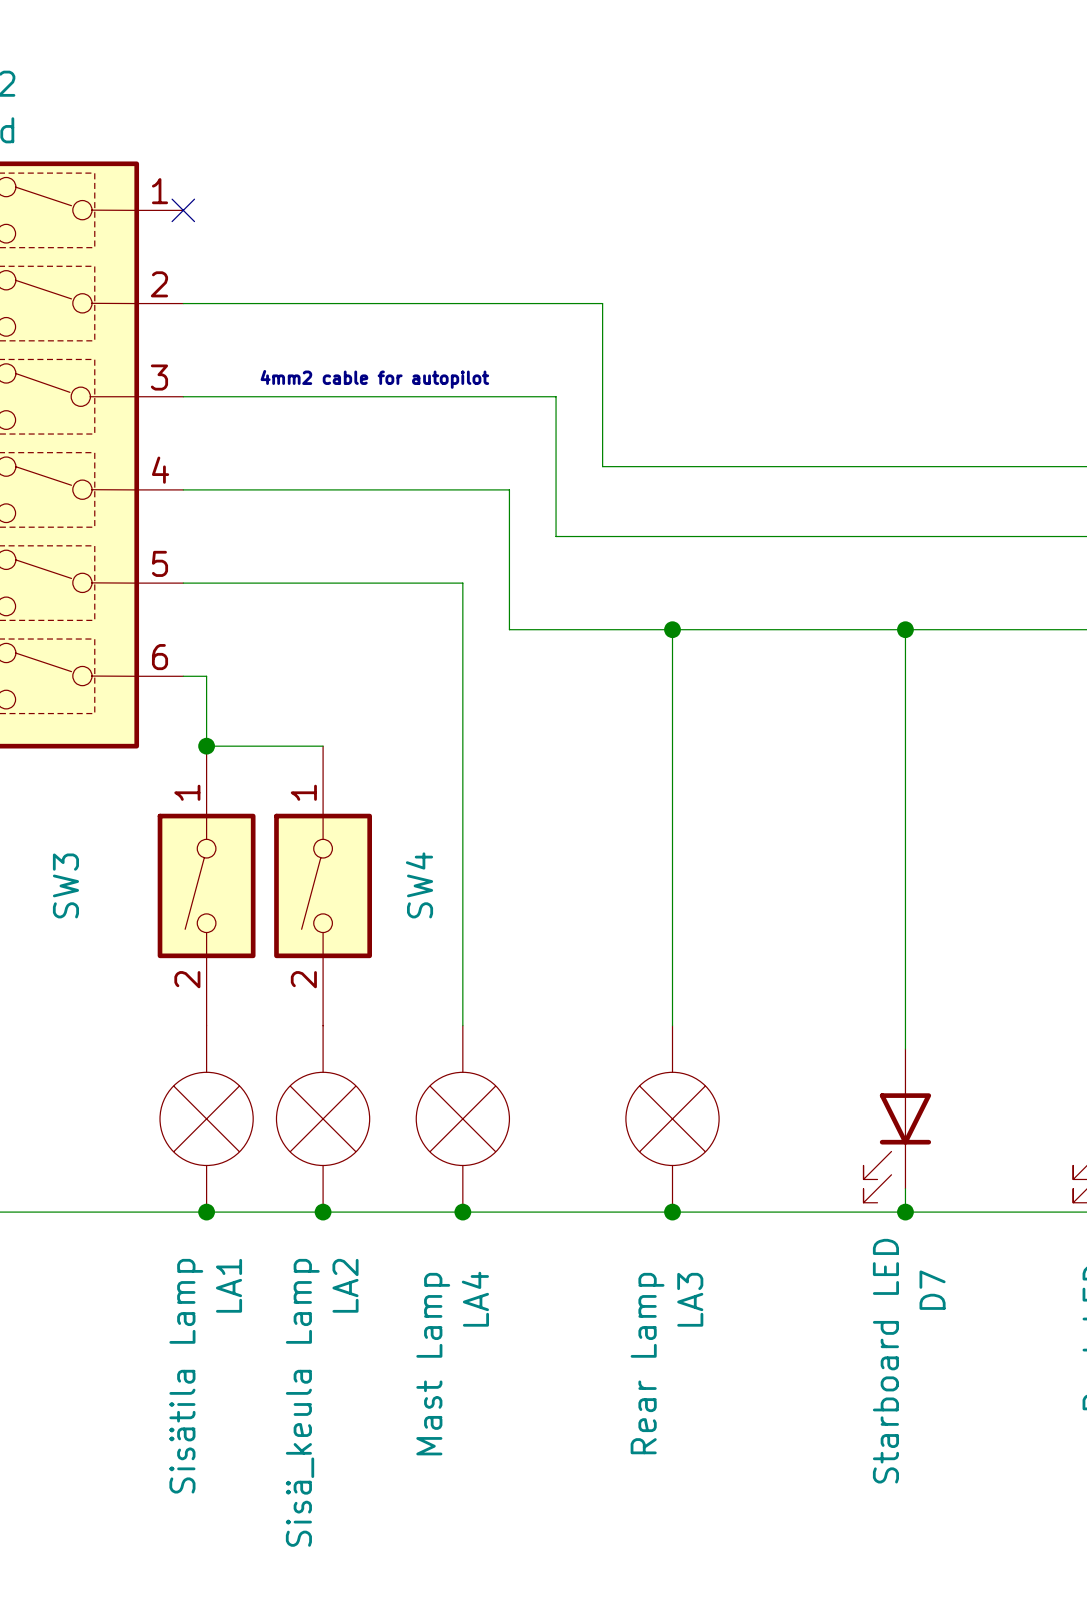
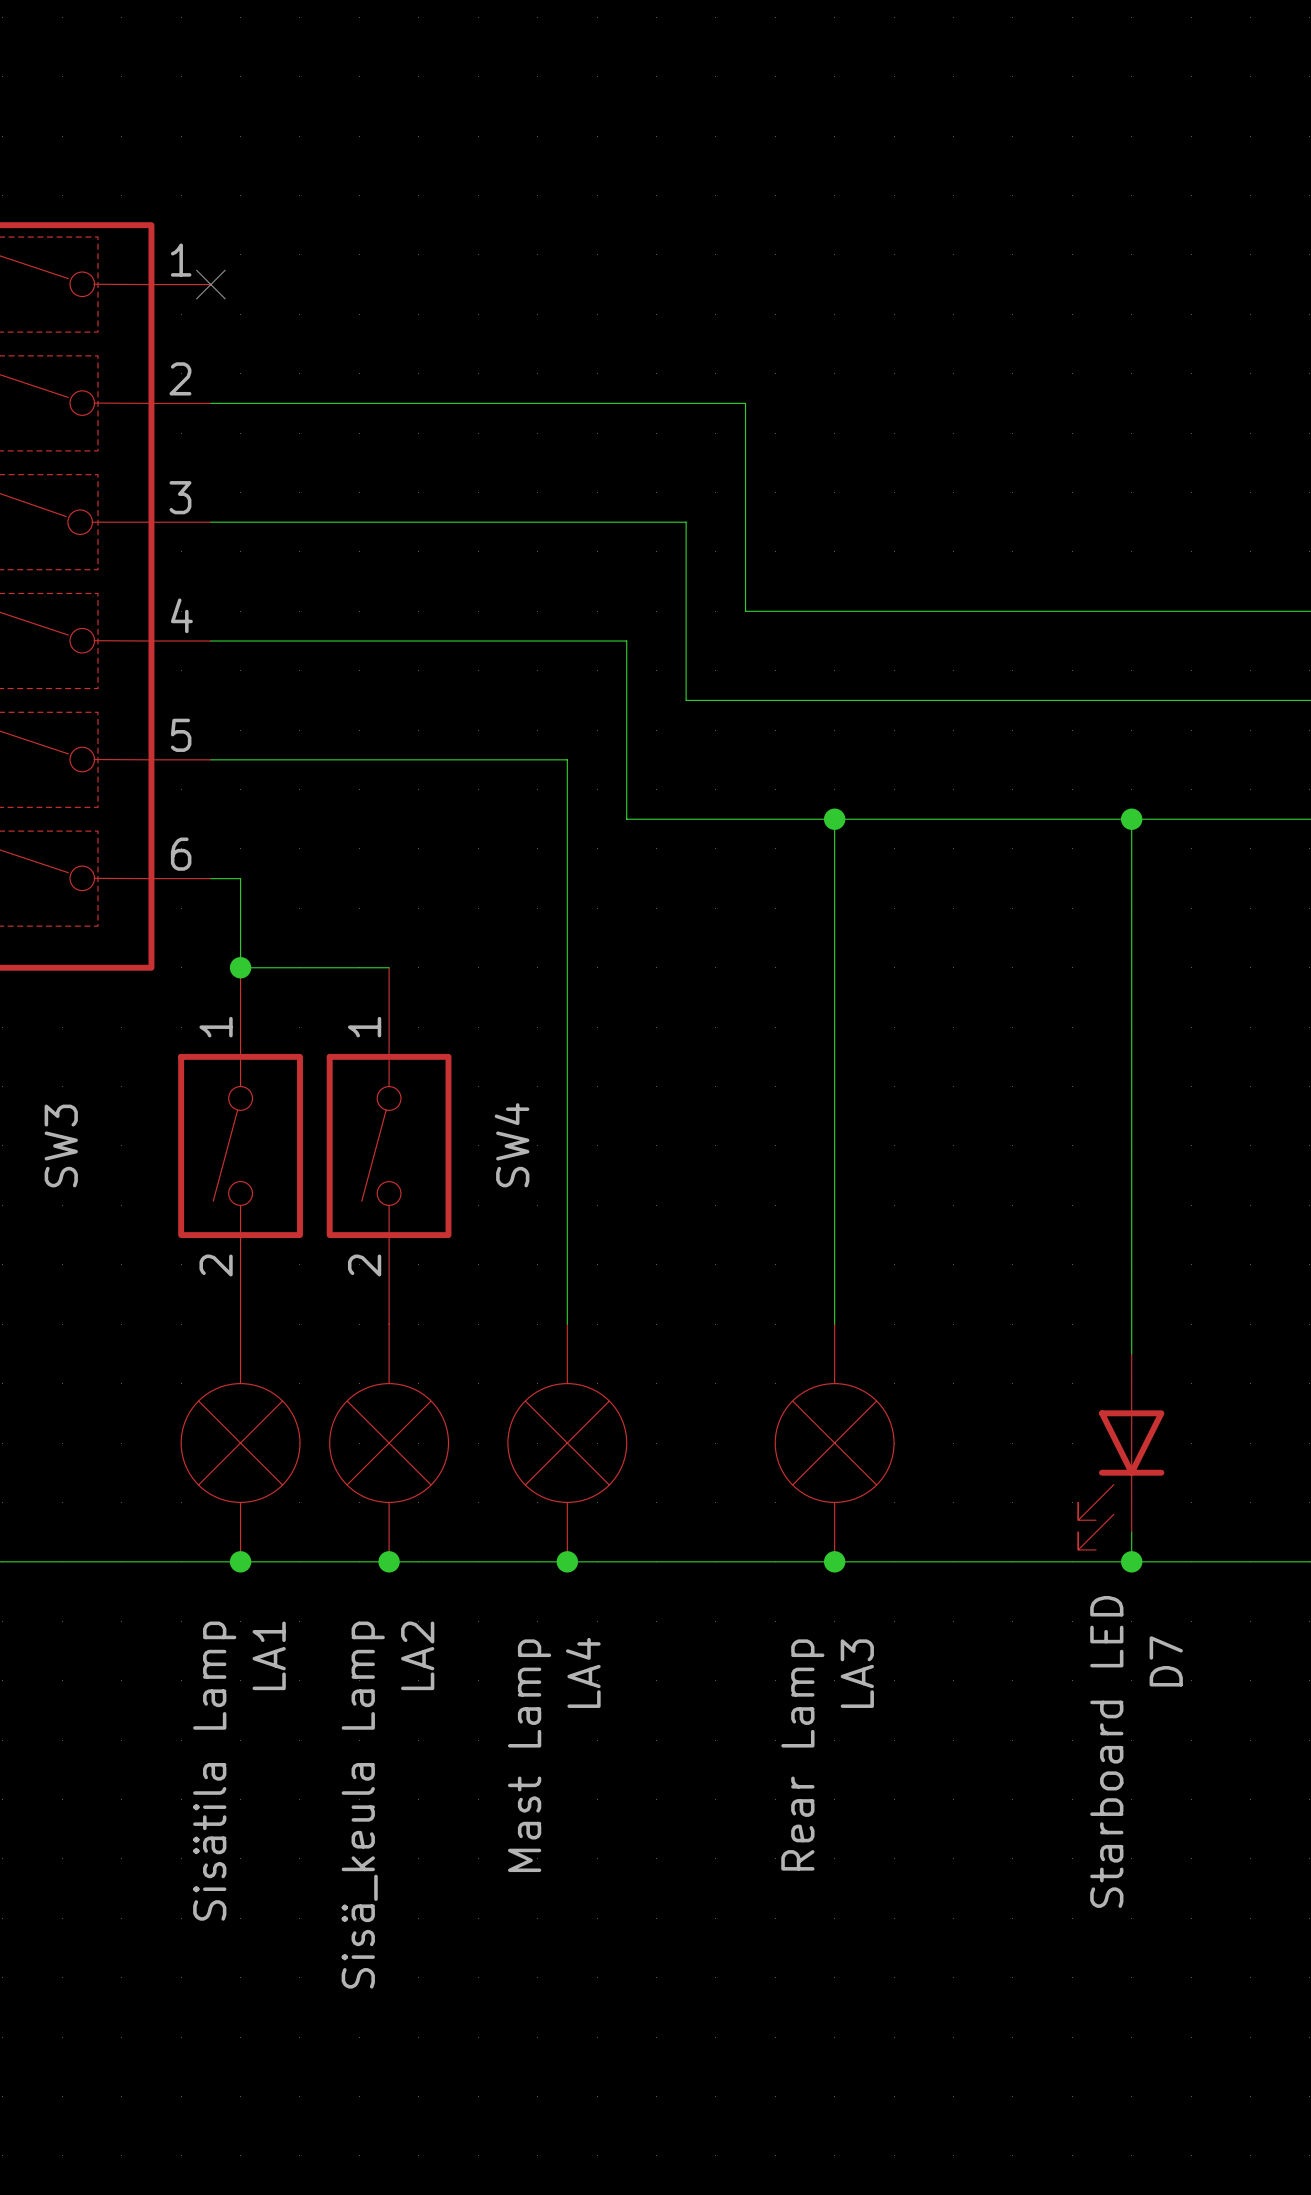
text: 4mm2 cable for autopilot (374, 379) -> none

